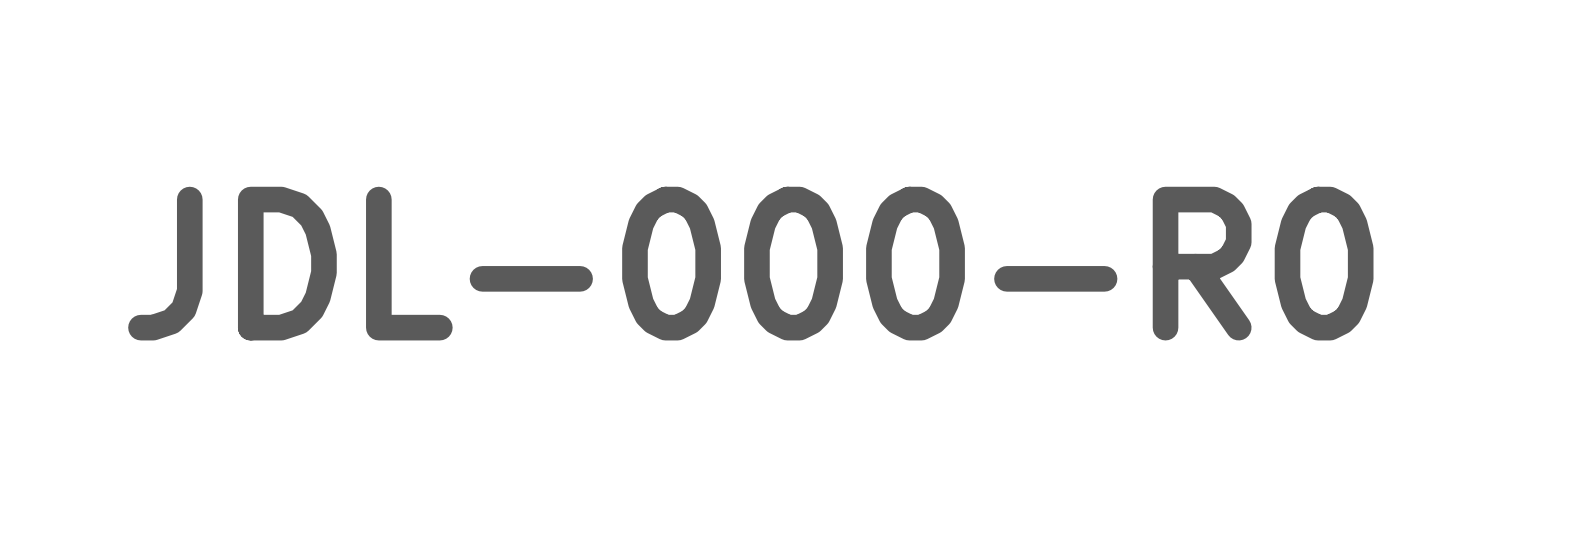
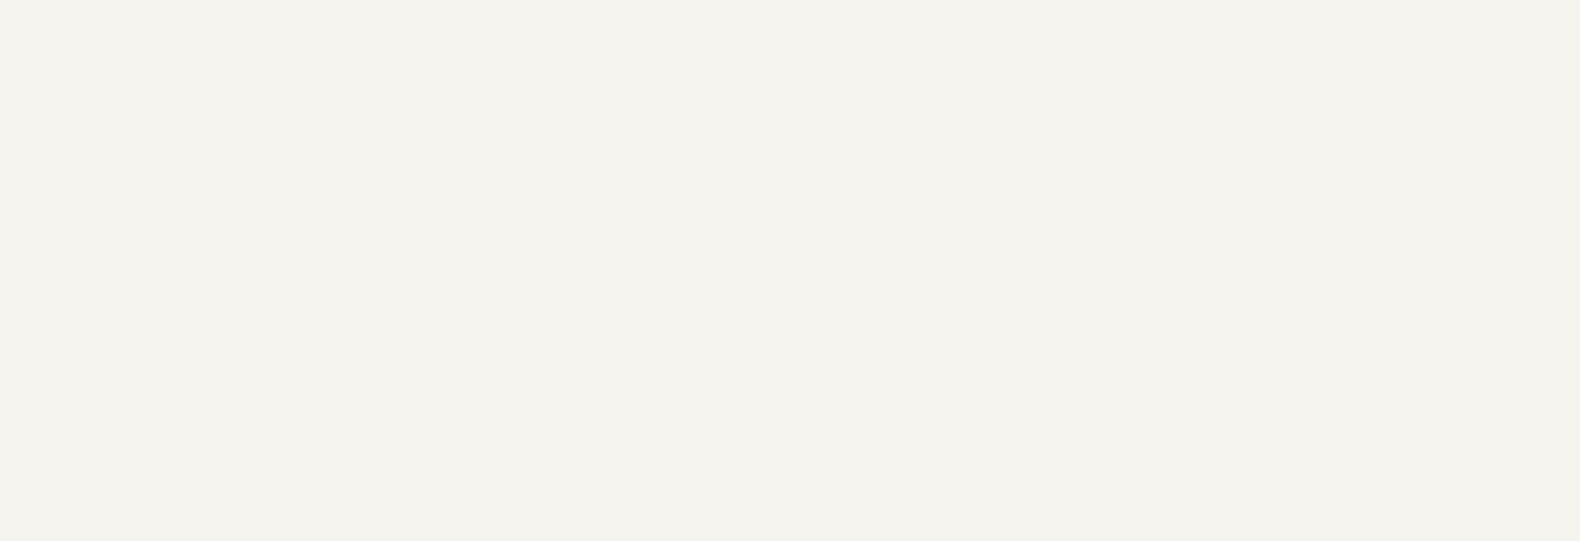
text: JDL-000-R0 (750, 263) -> none

